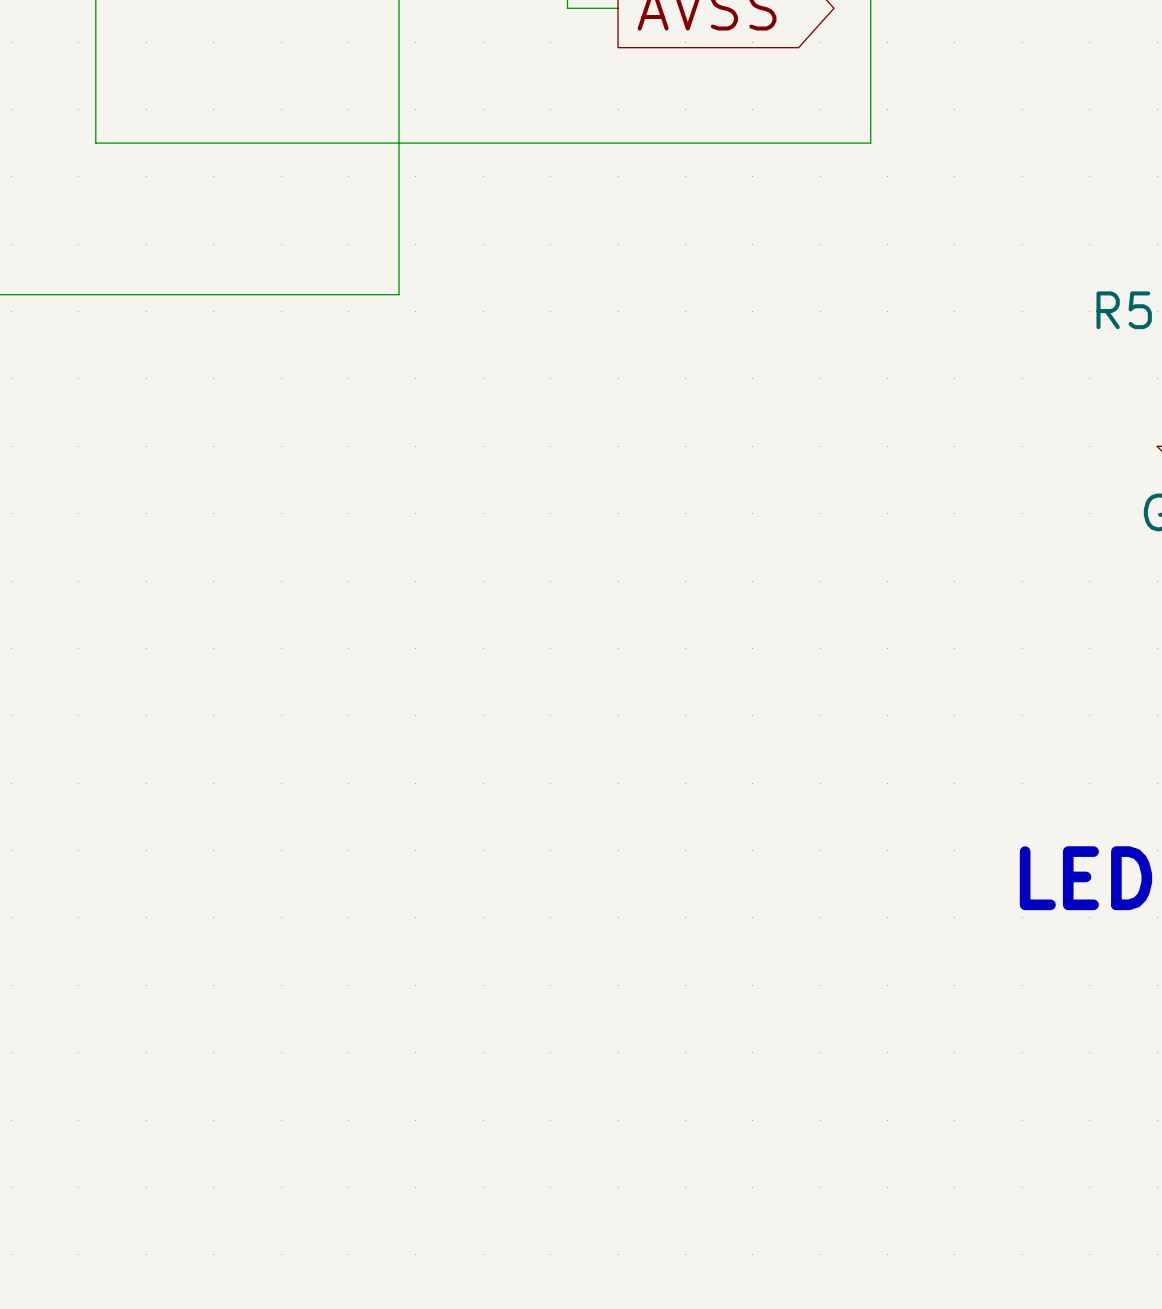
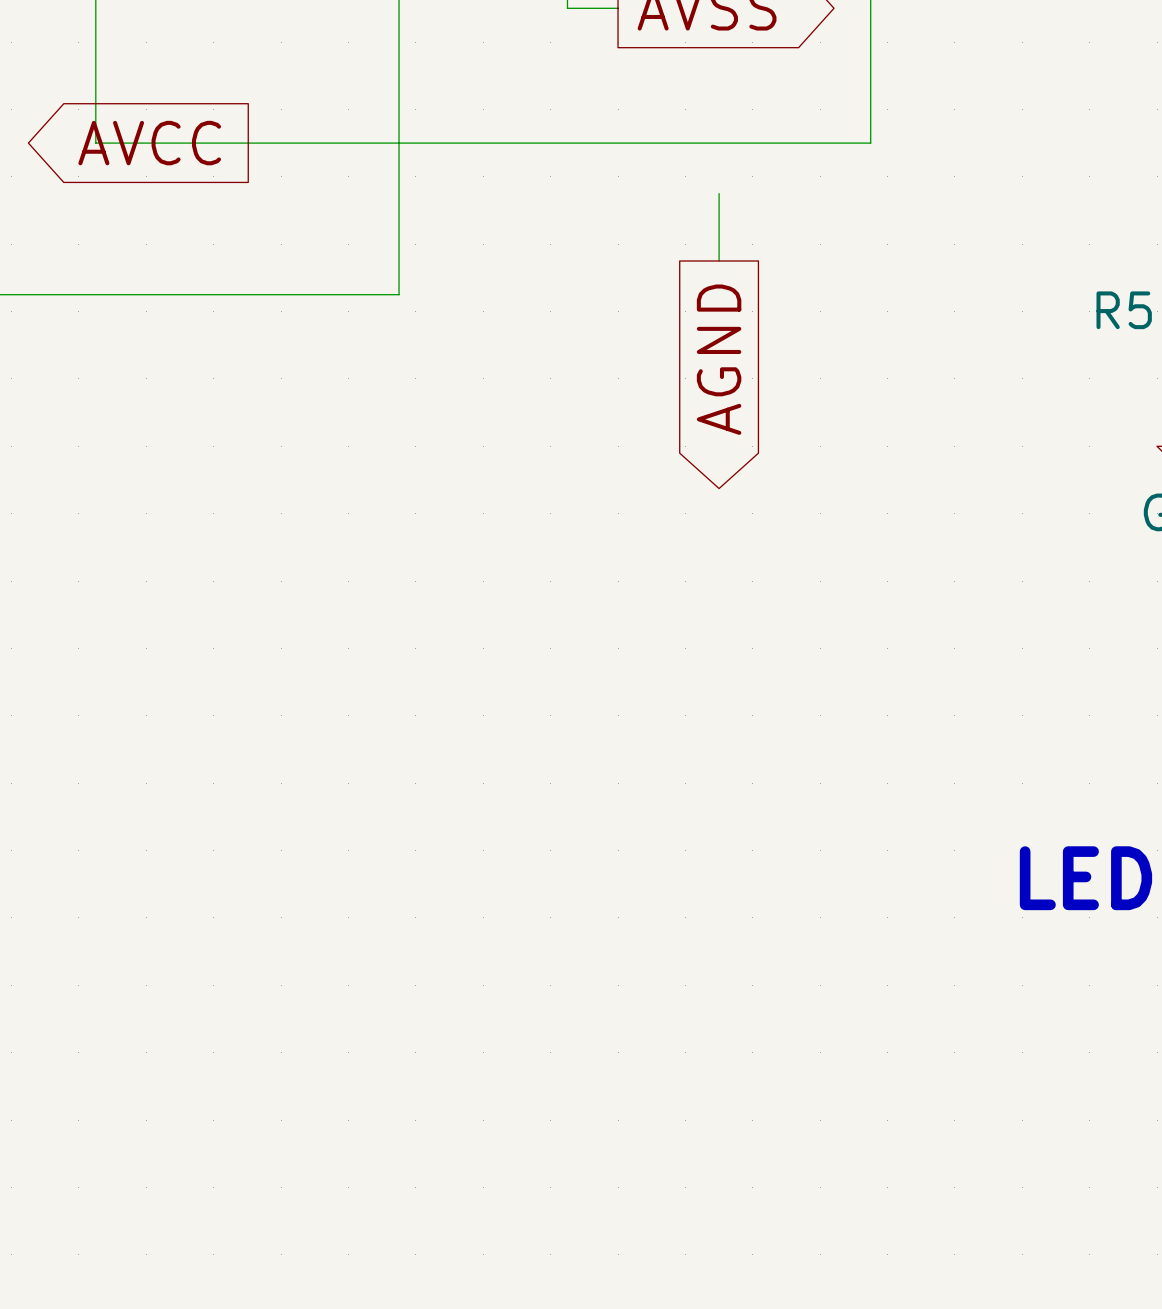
global label: none -> AVCC (149, 143)
wire: none -> (719, 193) (719, 260)
global label: none -> AGND (719, 359)

